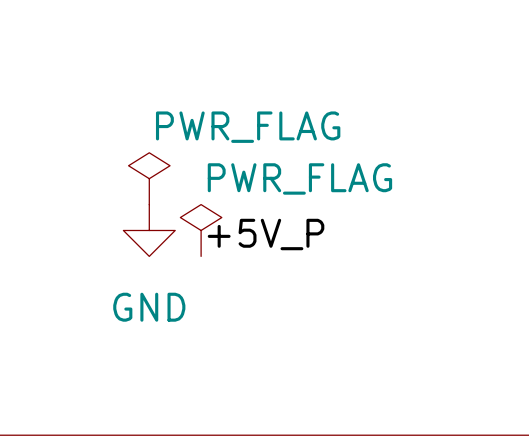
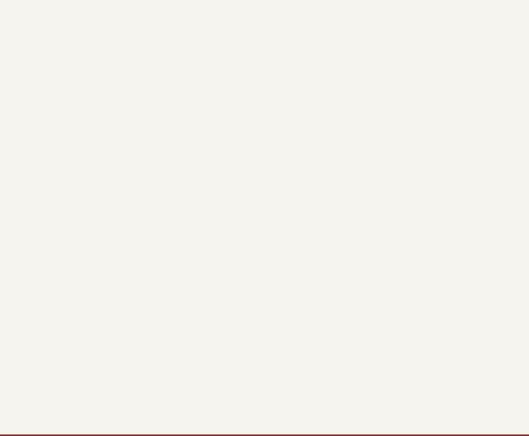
power symbol: PWR_FLAG (149, 178) -> none
power symbol: GND (149, 230) -> none
power symbol: PWR_FLAG (201, 230) -> none
label: +5V_P (266, 234) -> none

